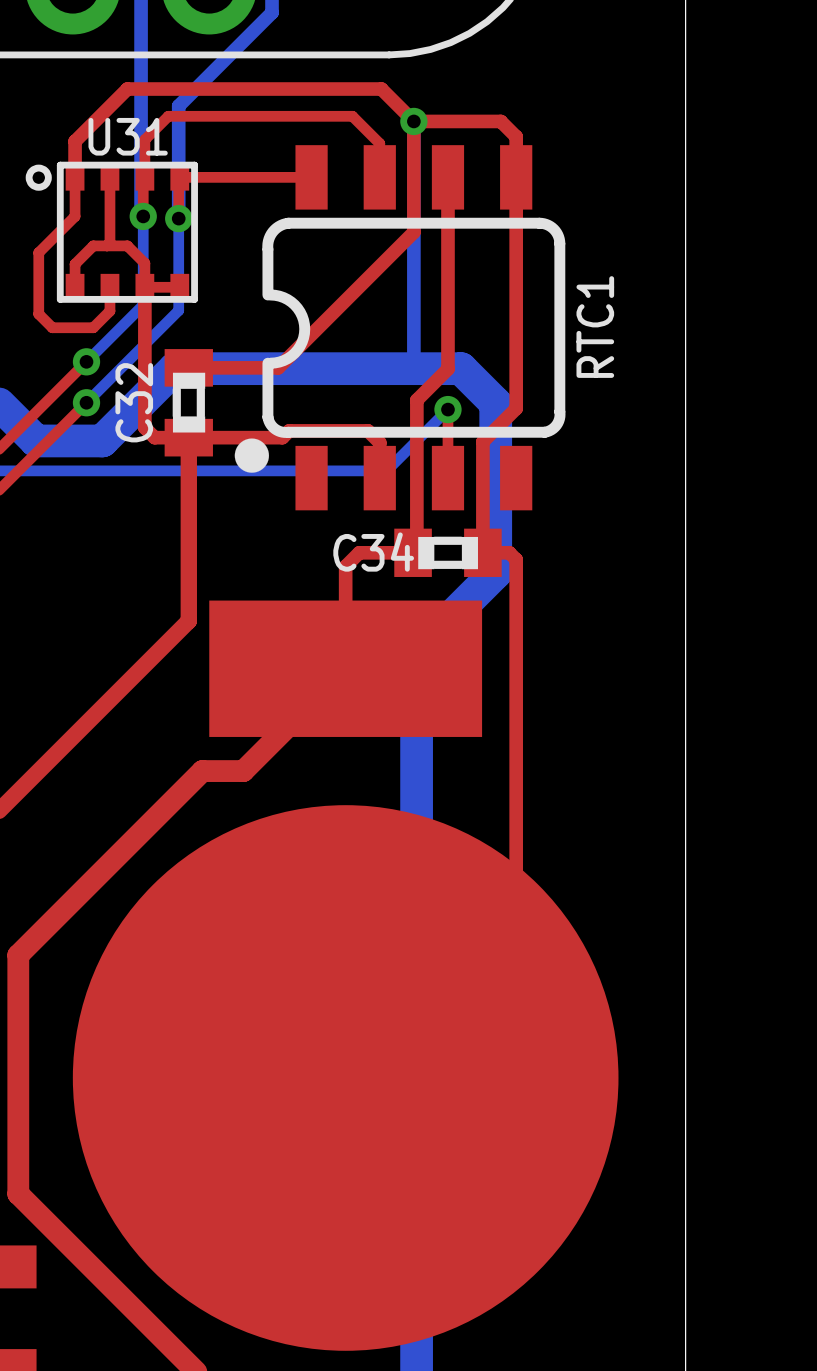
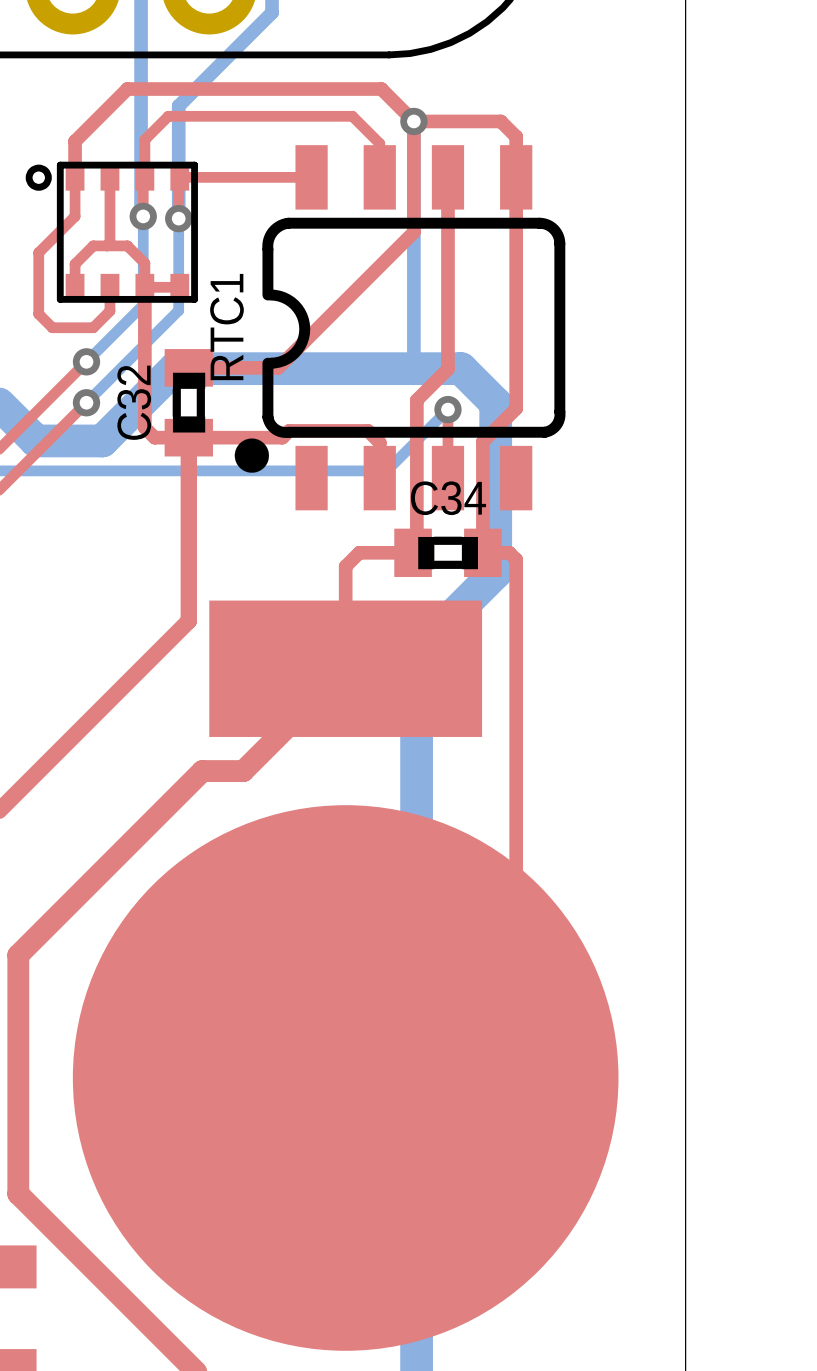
U31 name: U31 (128, 136) -> none
RTC1 name position: RTC1 (595, 327) -> RTC1 (226, 327)
C34 name position: C34 (373, 552) -> C34 (448, 498)

